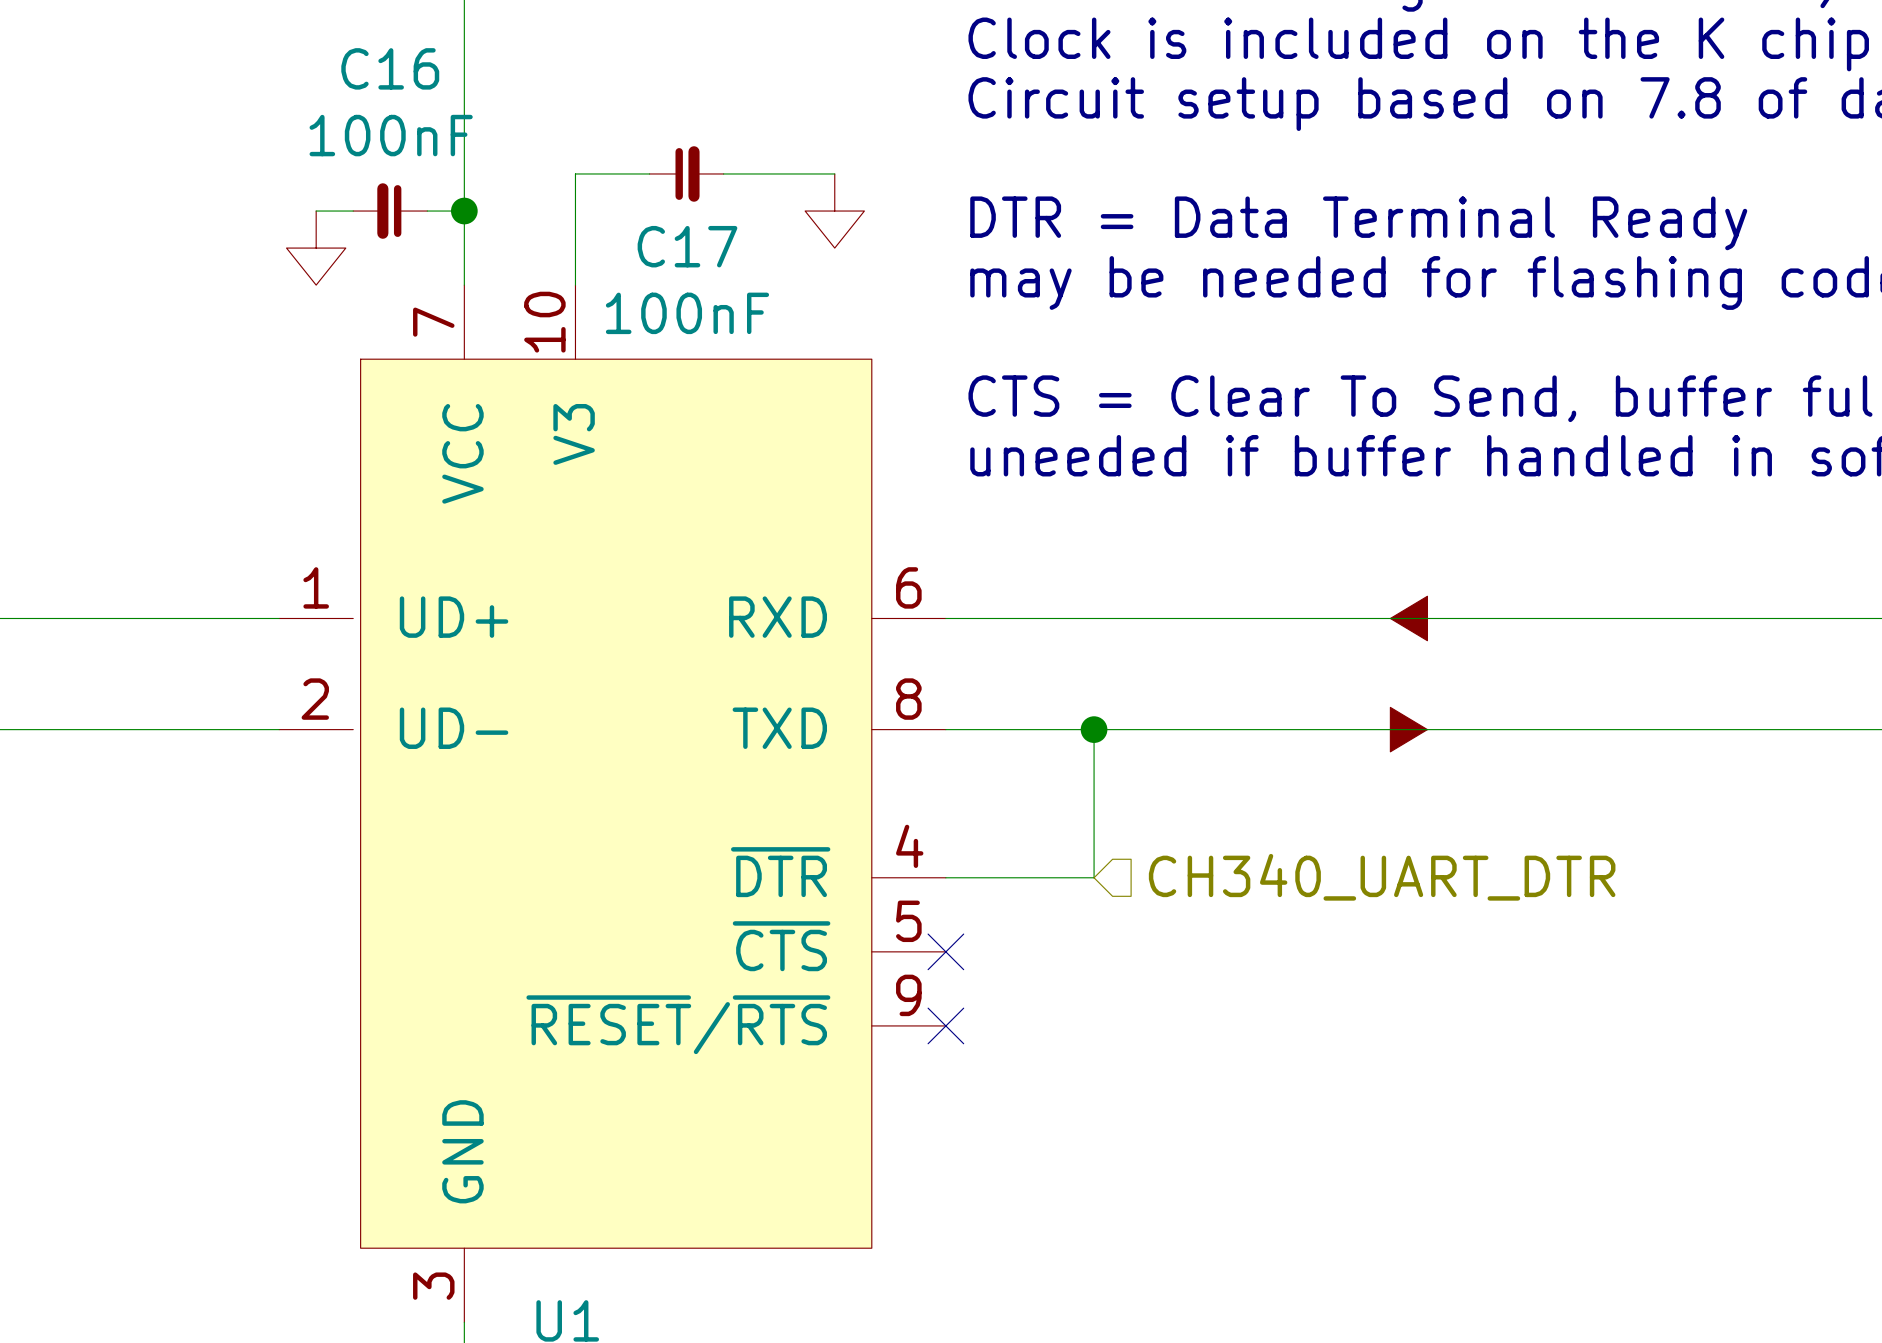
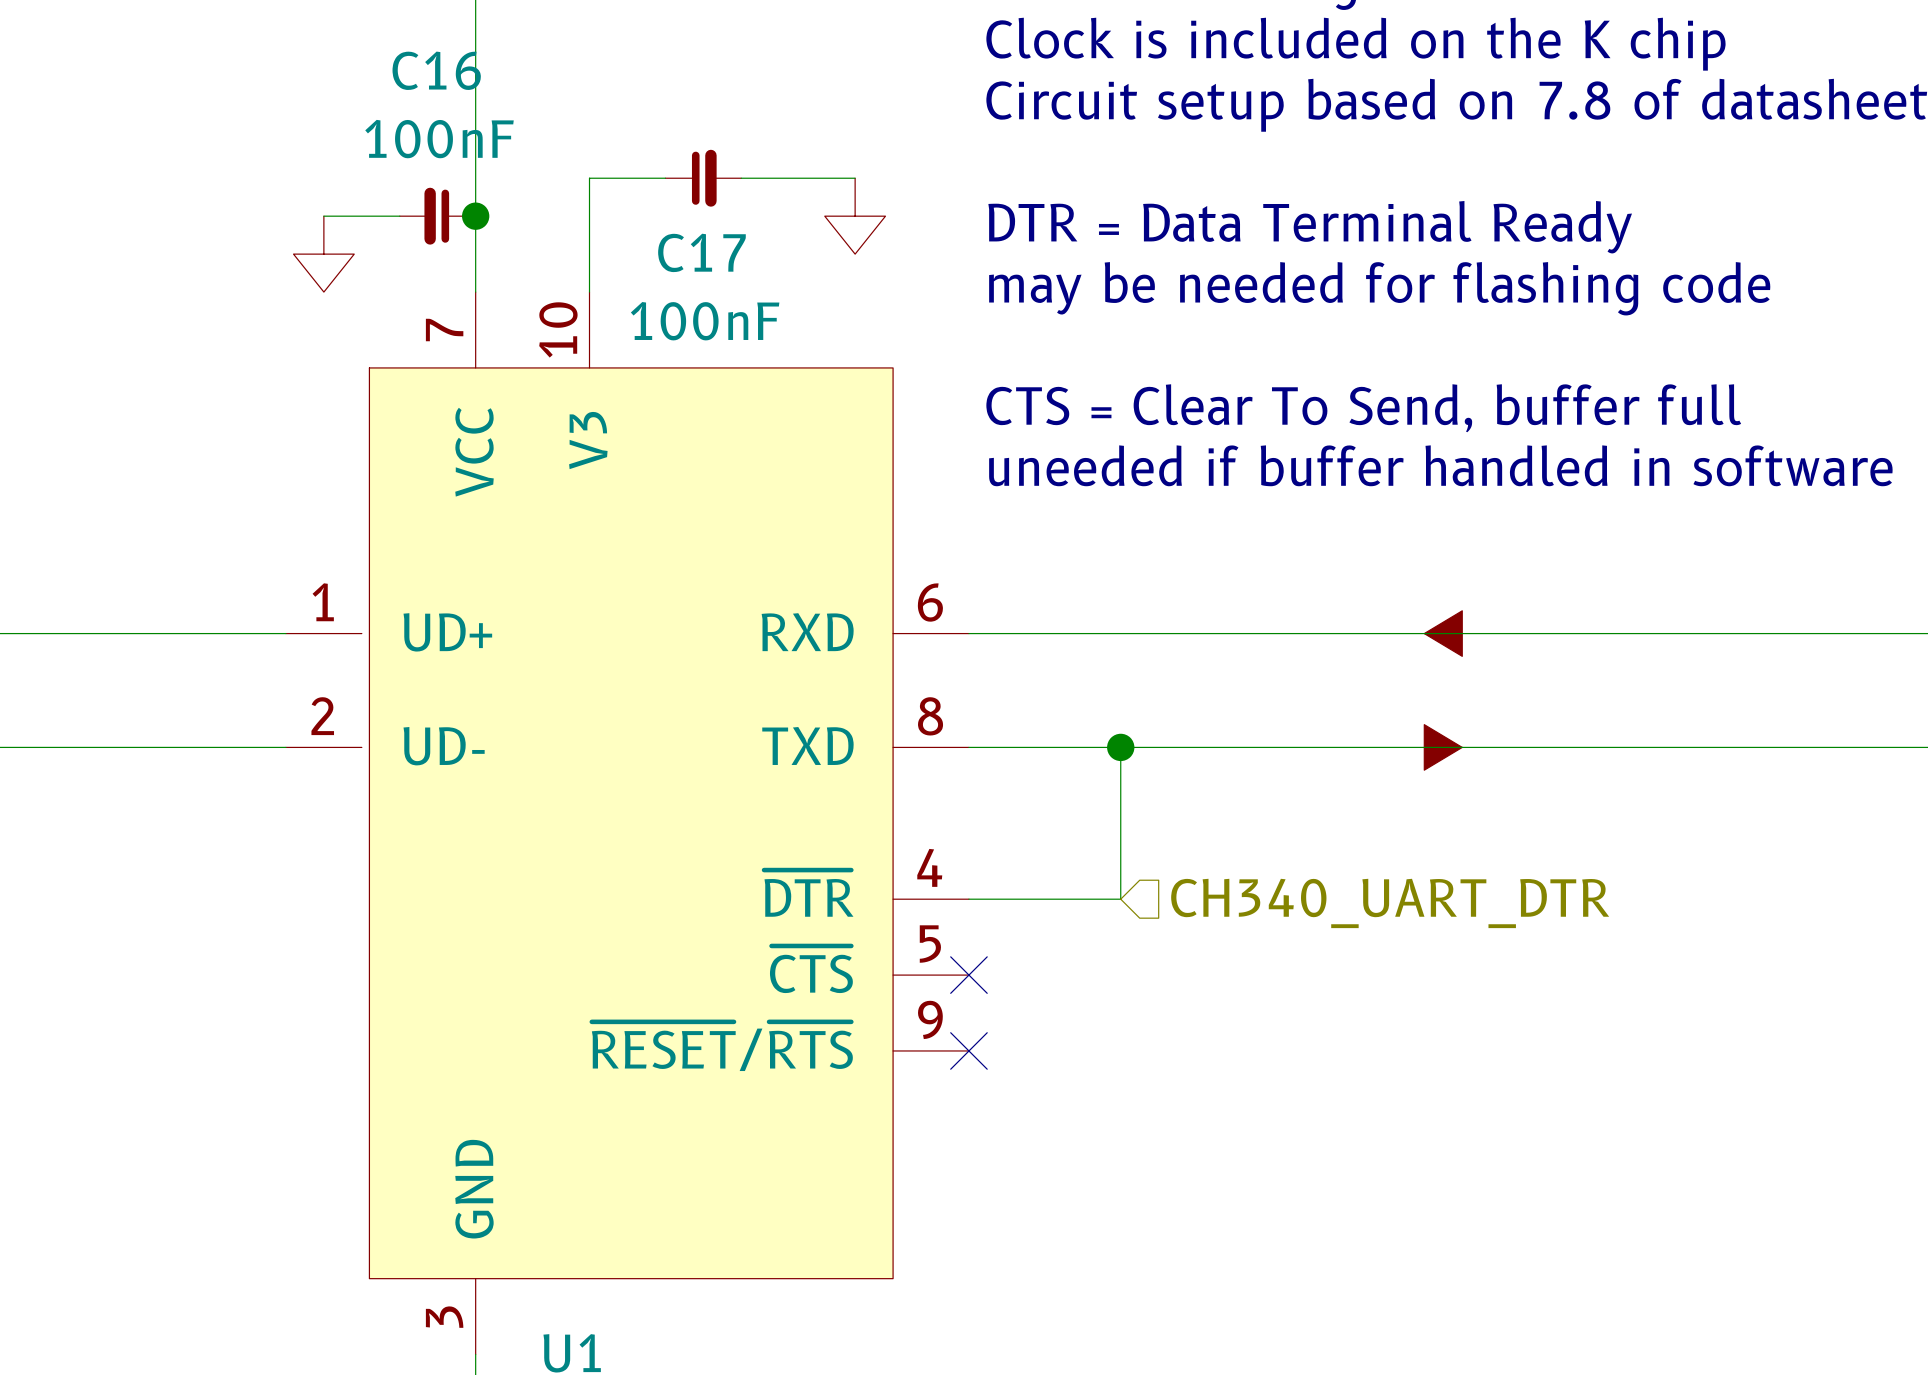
C16 position: (390, 211) -> (437, 216)

